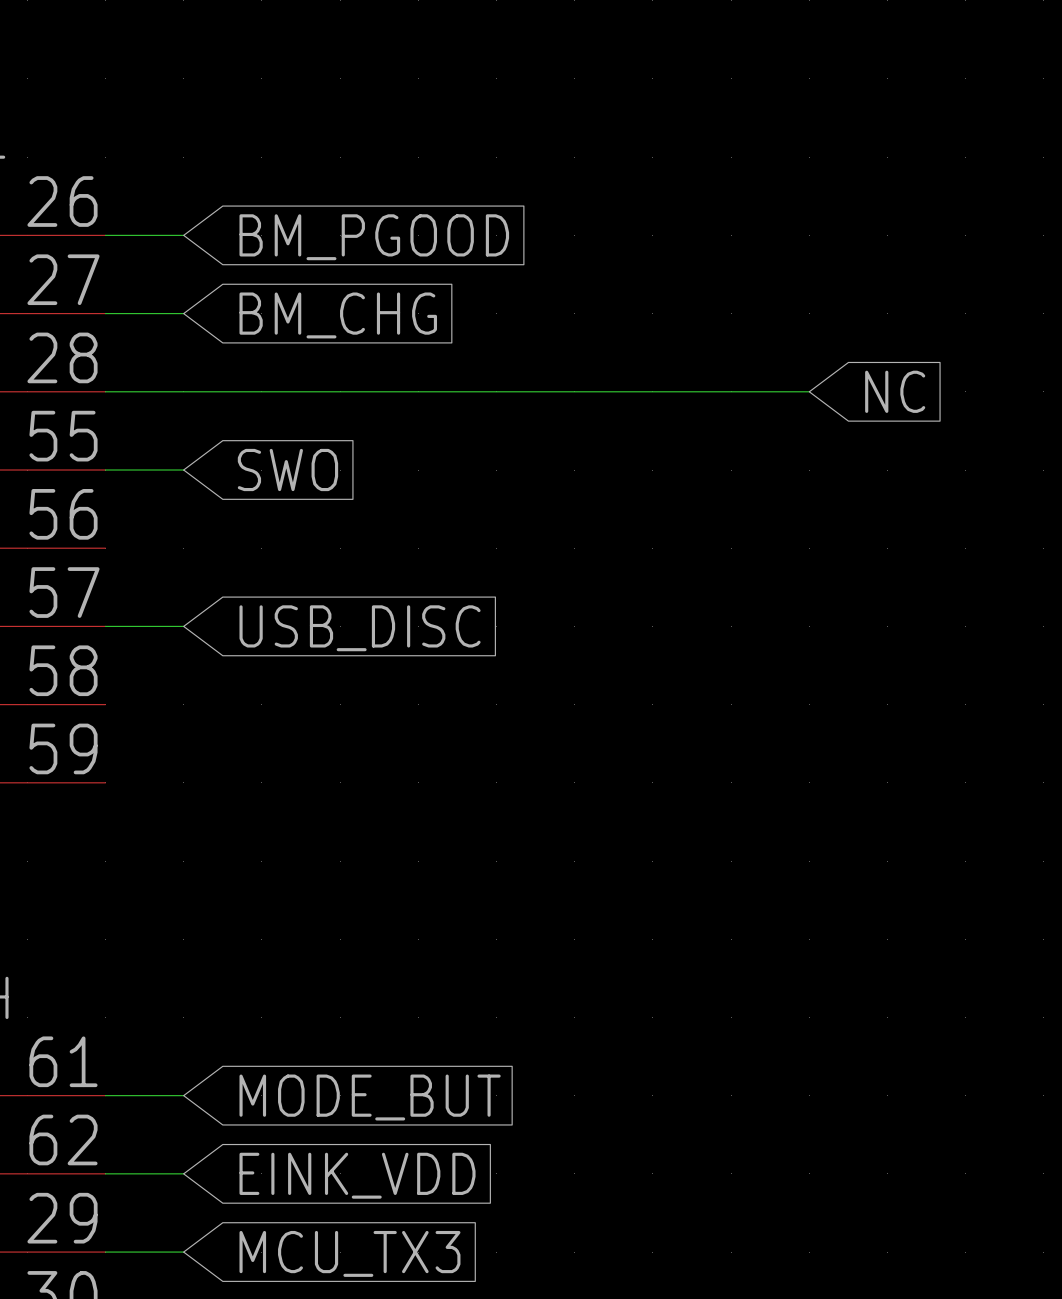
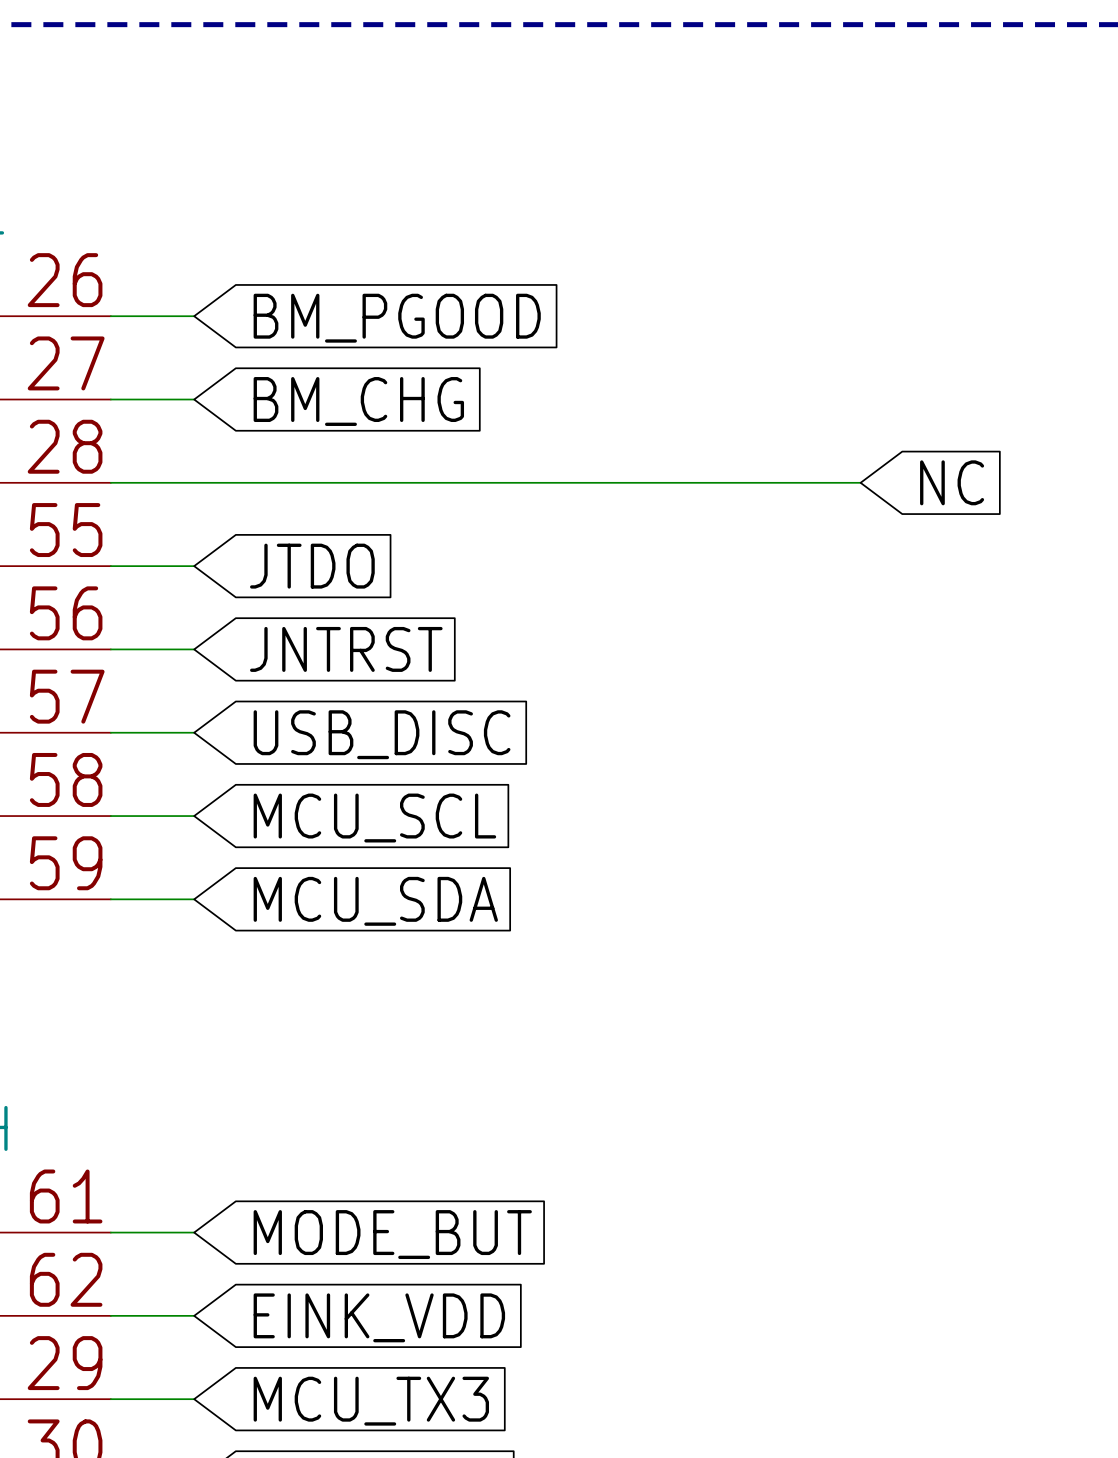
global label: SWO (287, 470) -> JTDO (312, 566)
wire: none -> (110, 649) (194, 649)
global label: none -> JNTRST (346, 649)
wire: none -> (110, 816) (194, 816)
global label: none -> MCU_SCL (374, 818)
wire: none -> (110, 899) (194, 899)
global label: none -> MCU_SDA (375, 901)

